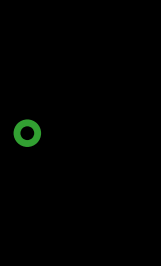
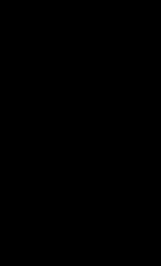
via: (27, 133) -> none

